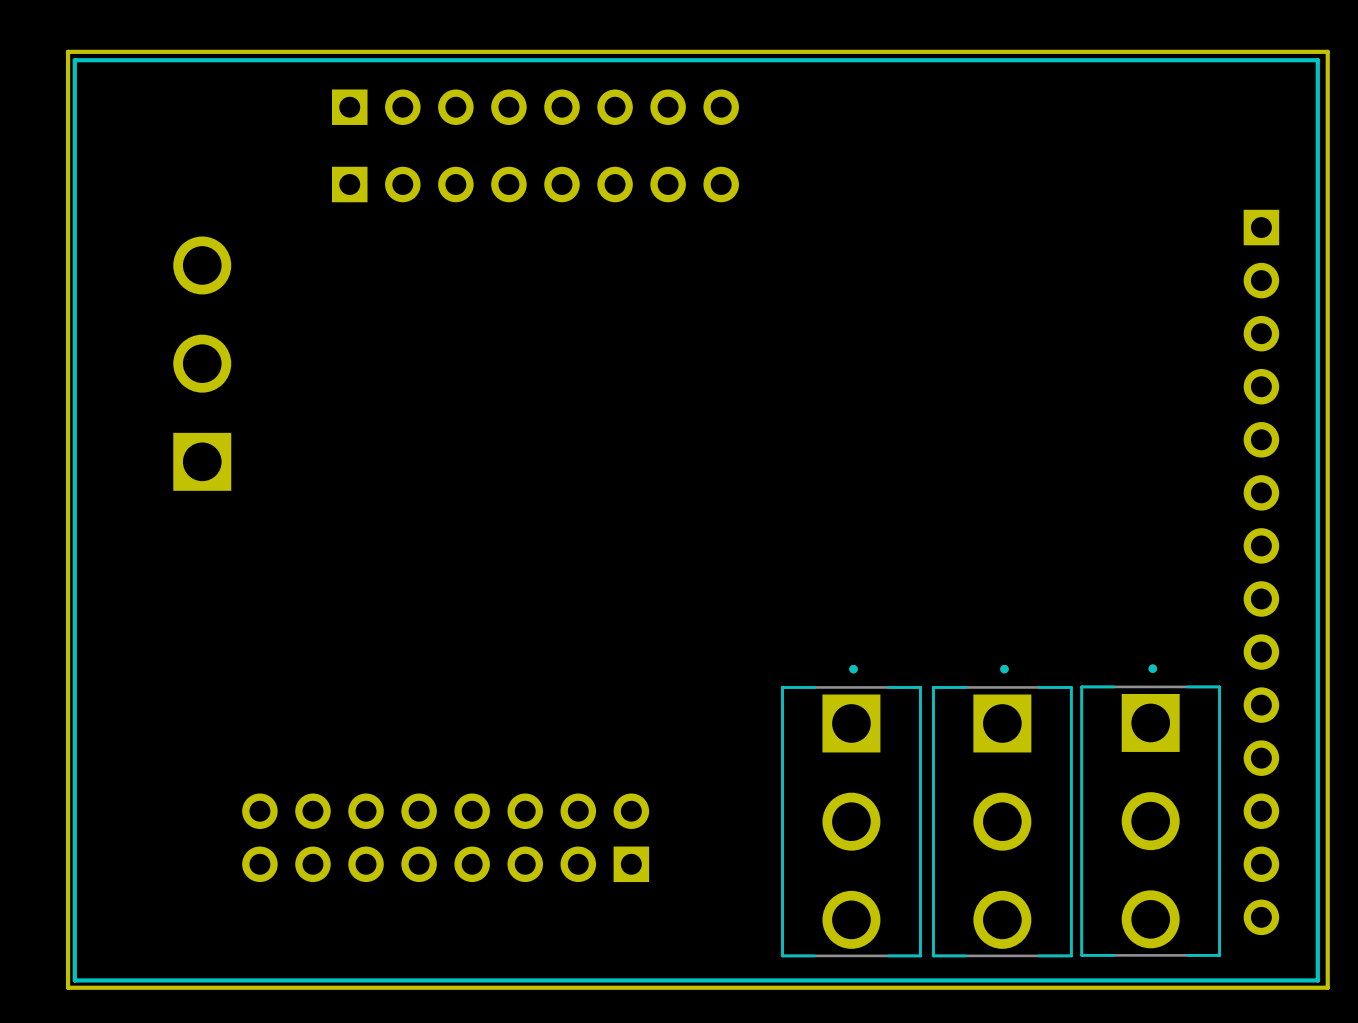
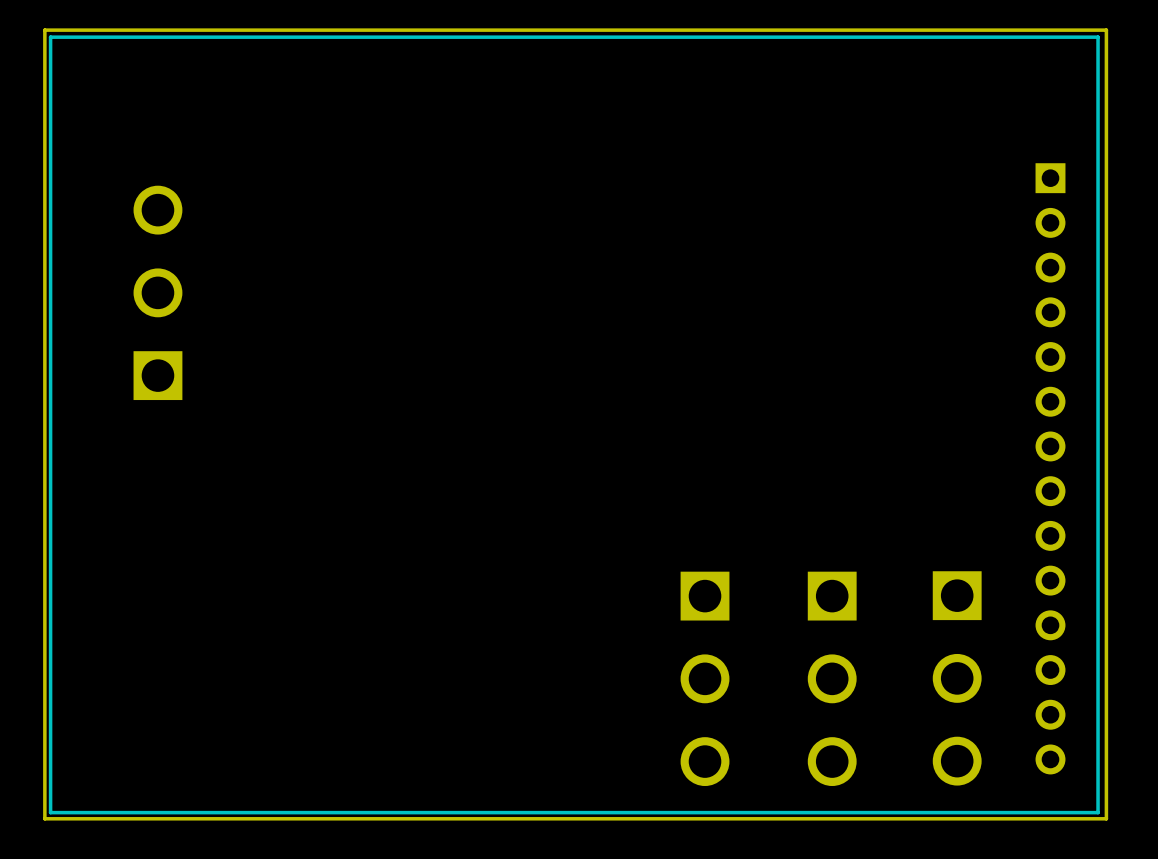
part: (535, 107) -> none
part: (535, 184) -> none
part side: bottom (1150, 810) -> top (957, 678)
part side: bottom (851, 811) -> top (705, 678)
part side: bottom (1002, 811) -> top (832, 678)
part: (445, 837) -> none

